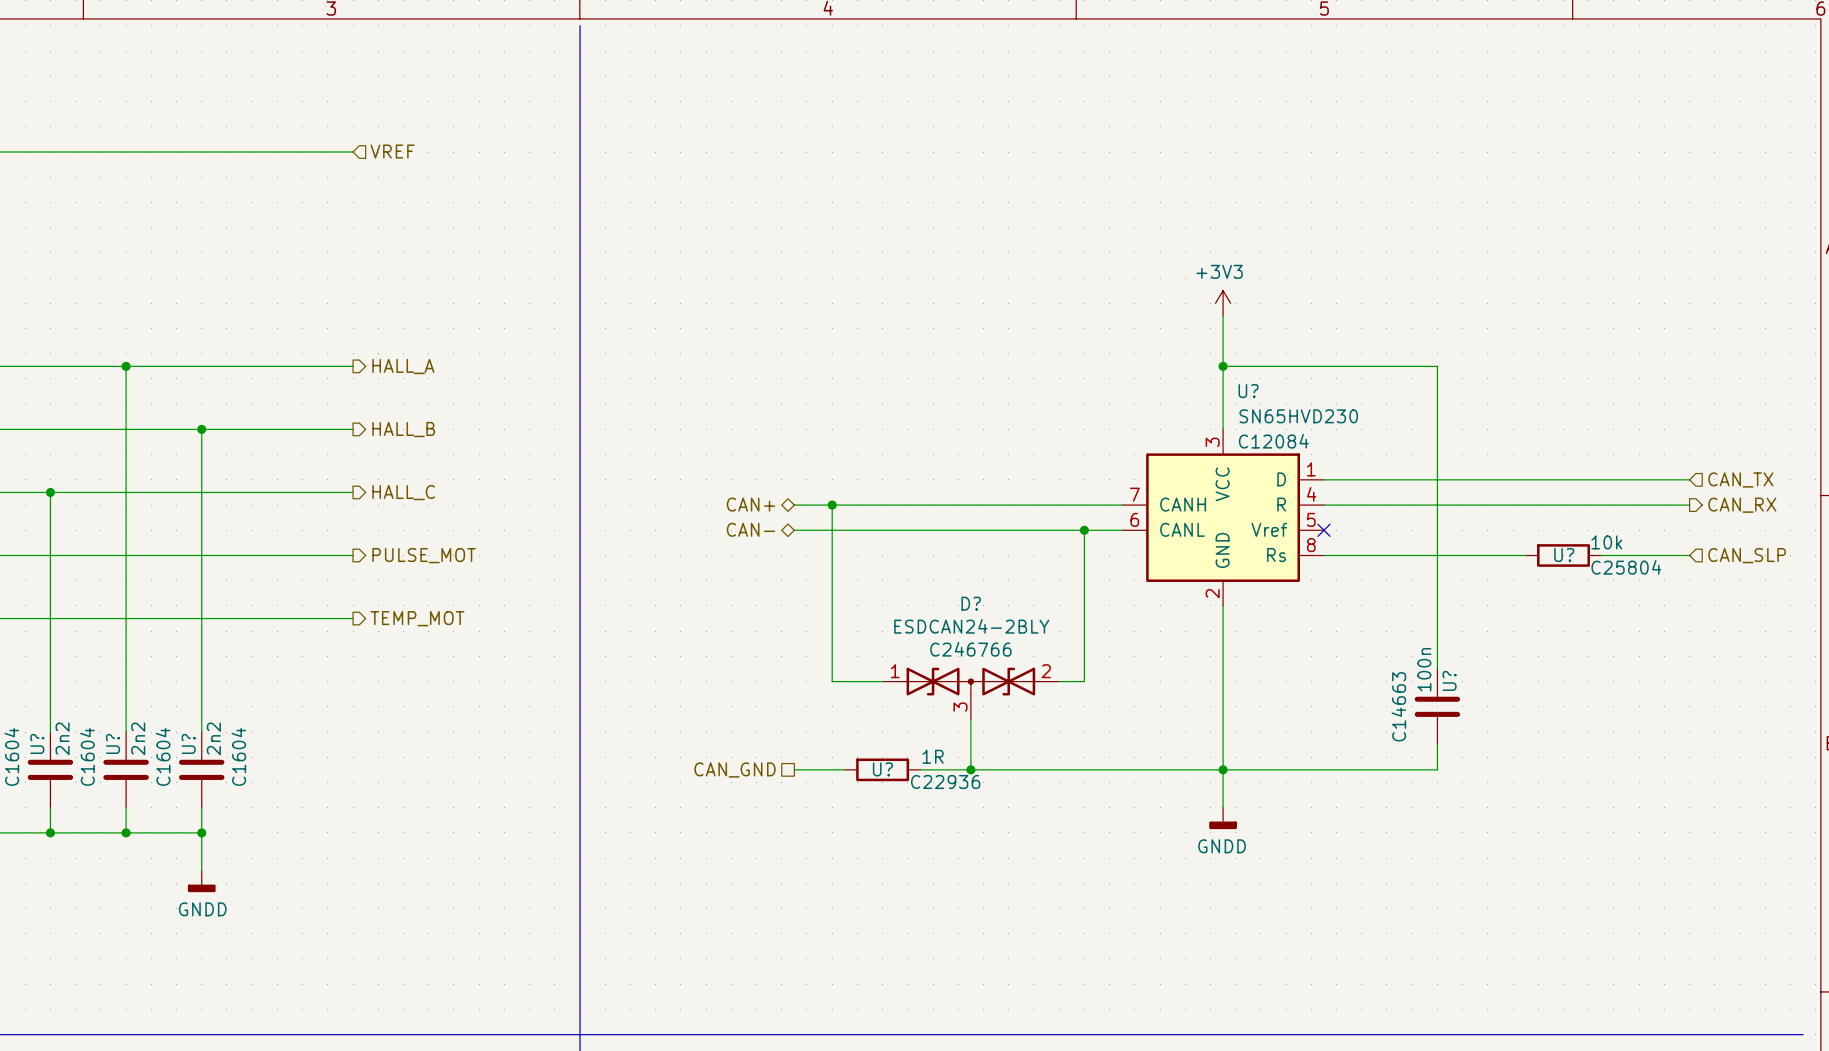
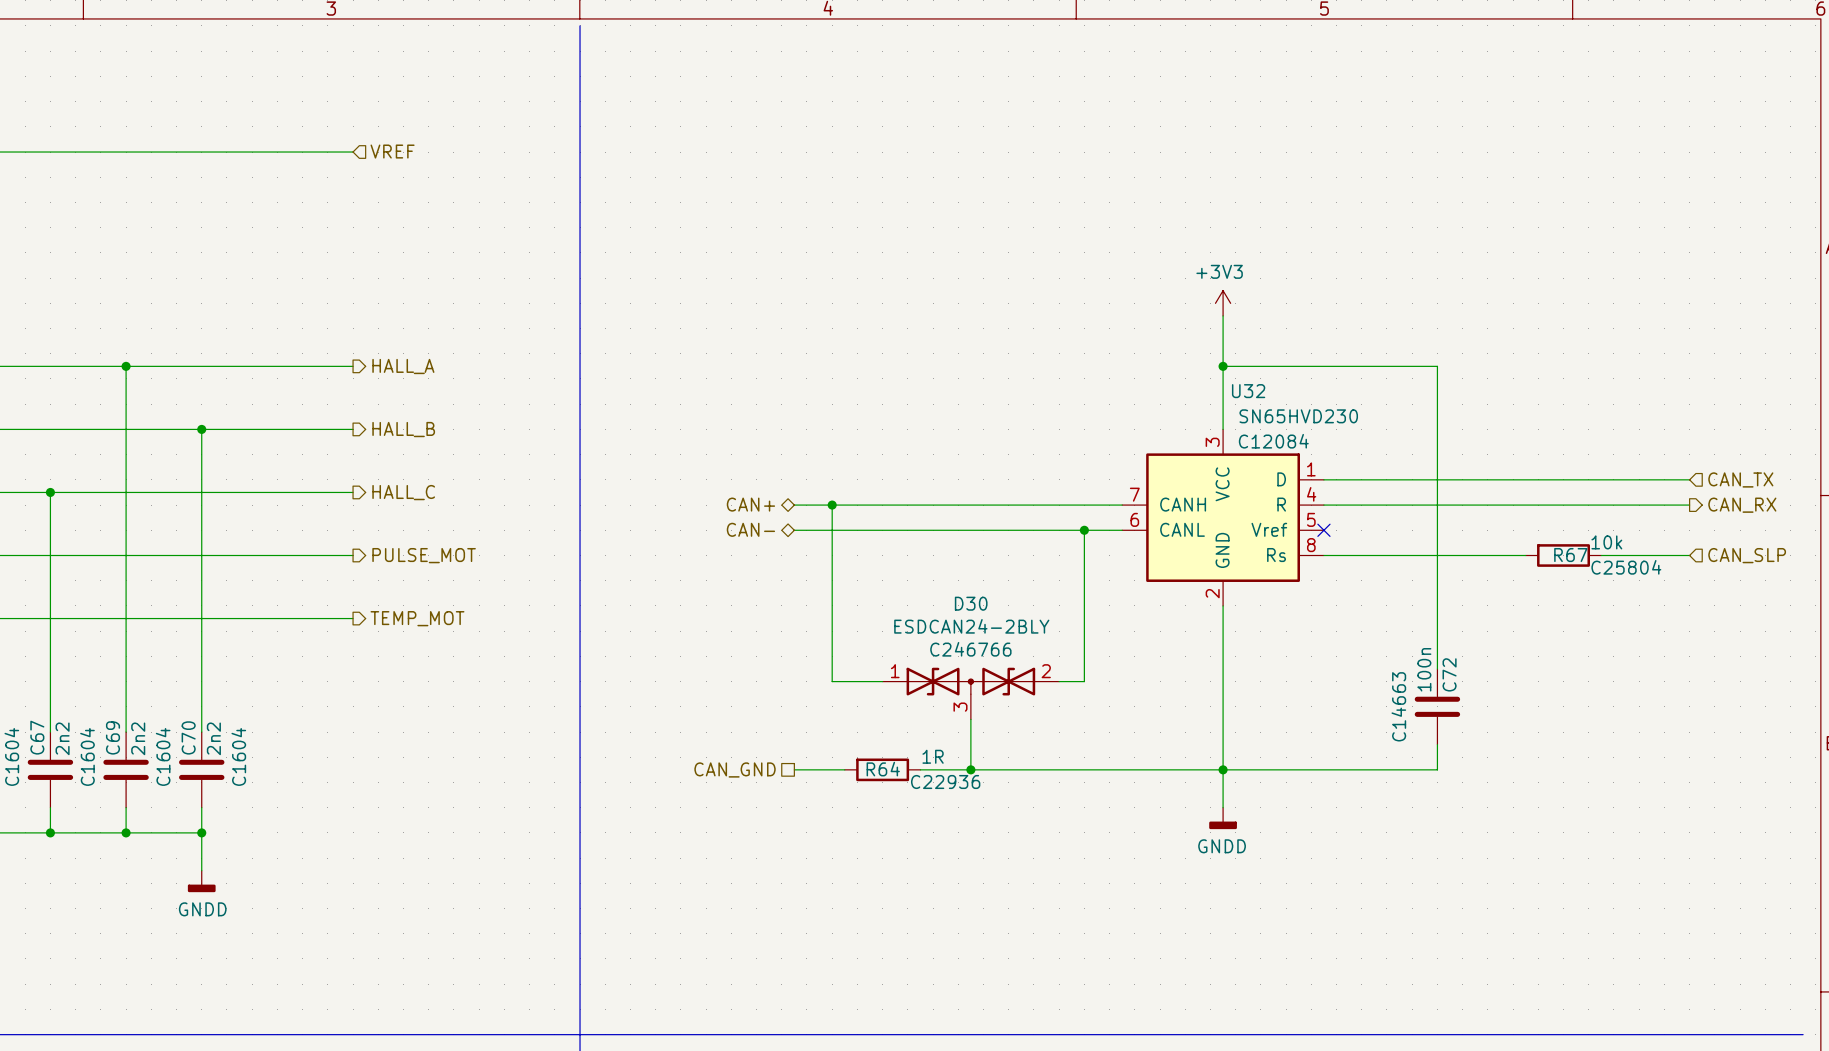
U? name: U? (1248, 391) -> U32 (1248, 391)
U? name: U? (1564, 555) -> R67 (1570, 555)
D? name: D? (971, 603) -> D30 (971, 603)
U? name: U? (1449, 680) -> C72 (1449, 674)
U? name: U? (37, 743) -> C67 (37, 737)
U? name: U? (113, 743) -> C69 (113, 737)
U? name: U? (188, 743) -> C70 (188, 737)
U? name: U? (882, 769) -> R64 (883, 769)

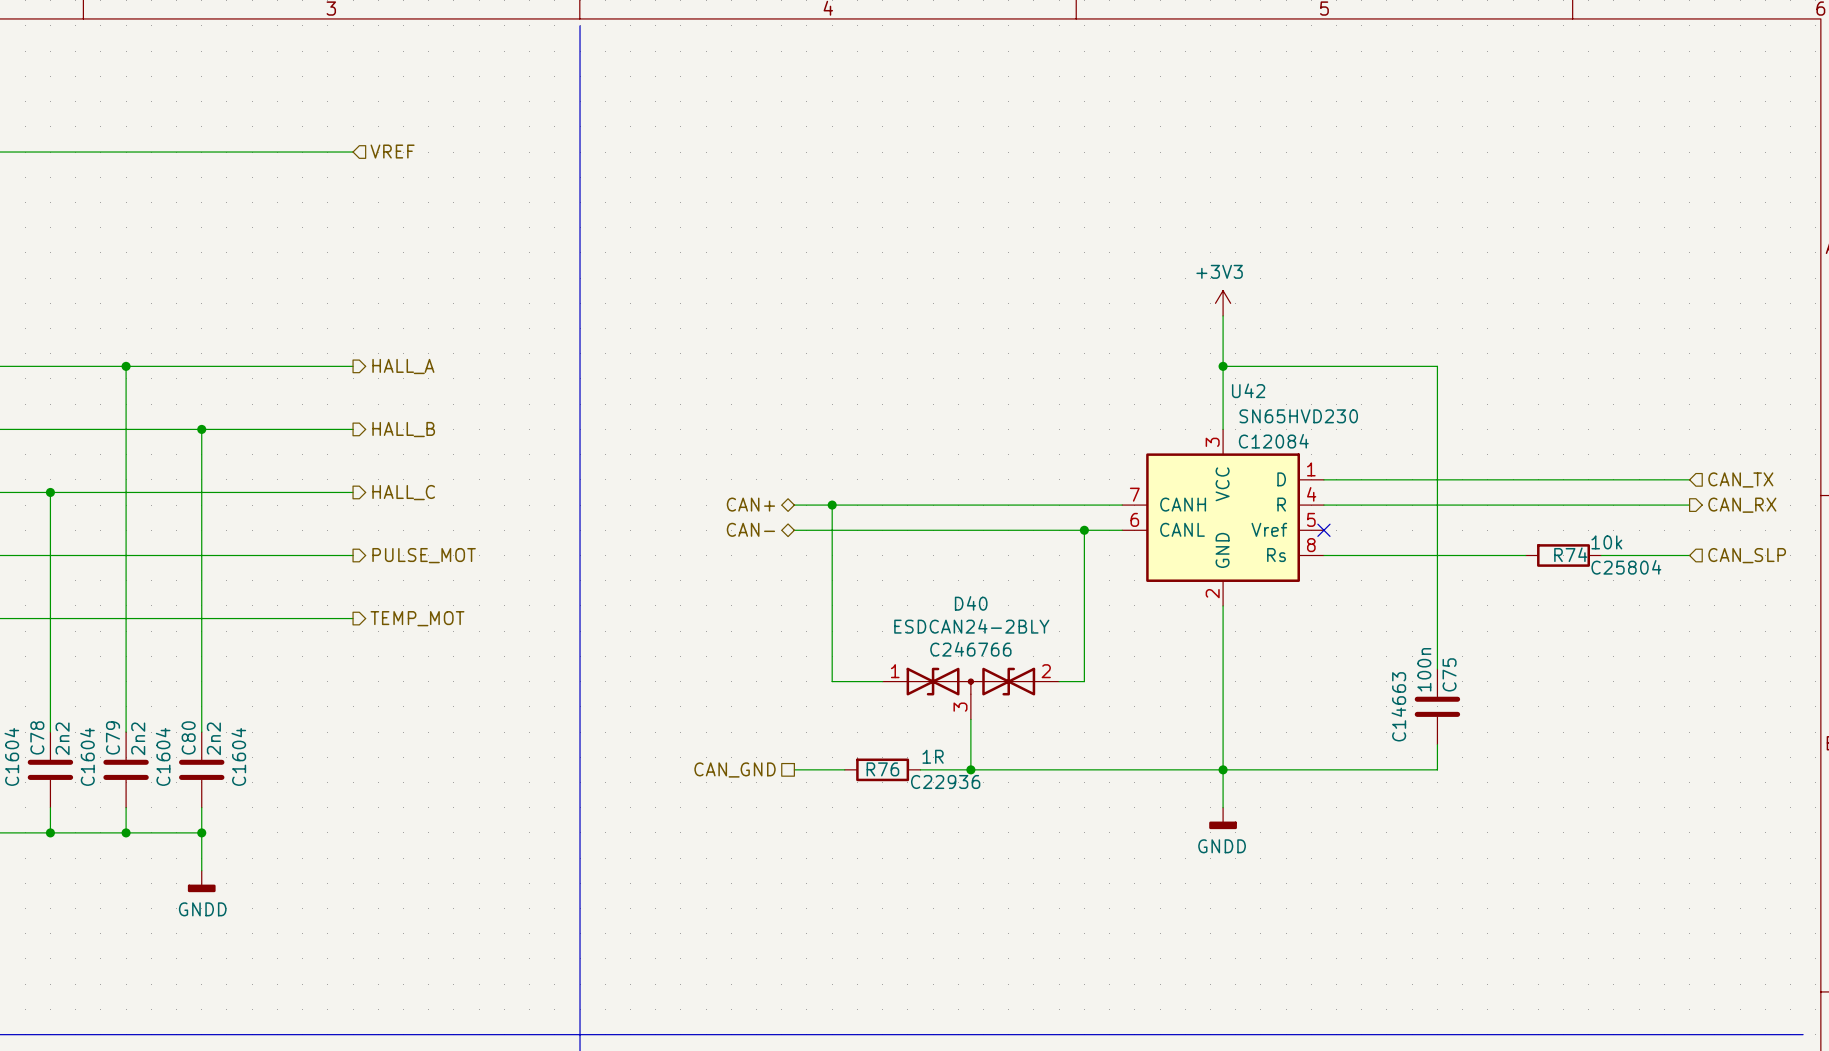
U32 name: U32 (1248, 391) -> U42 (1248, 390)
R67 name: R67 (1570, 555) -> R74 (1570, 554)
D30 name: D30 (971, 603) -> D40 (971, 603)
C72 name: C72 (1449, 674) -> C75 (1449, 674)
C67 name: C67 (37, 737) -> C78 (37, 737)
C69 name: C69 (113, 737) -> C79 (113, 737)
C70 name: C70 (188, 737) -> C80 (188, 737)
R64 name: R64 (883, 769) -> R76 (882, 769)

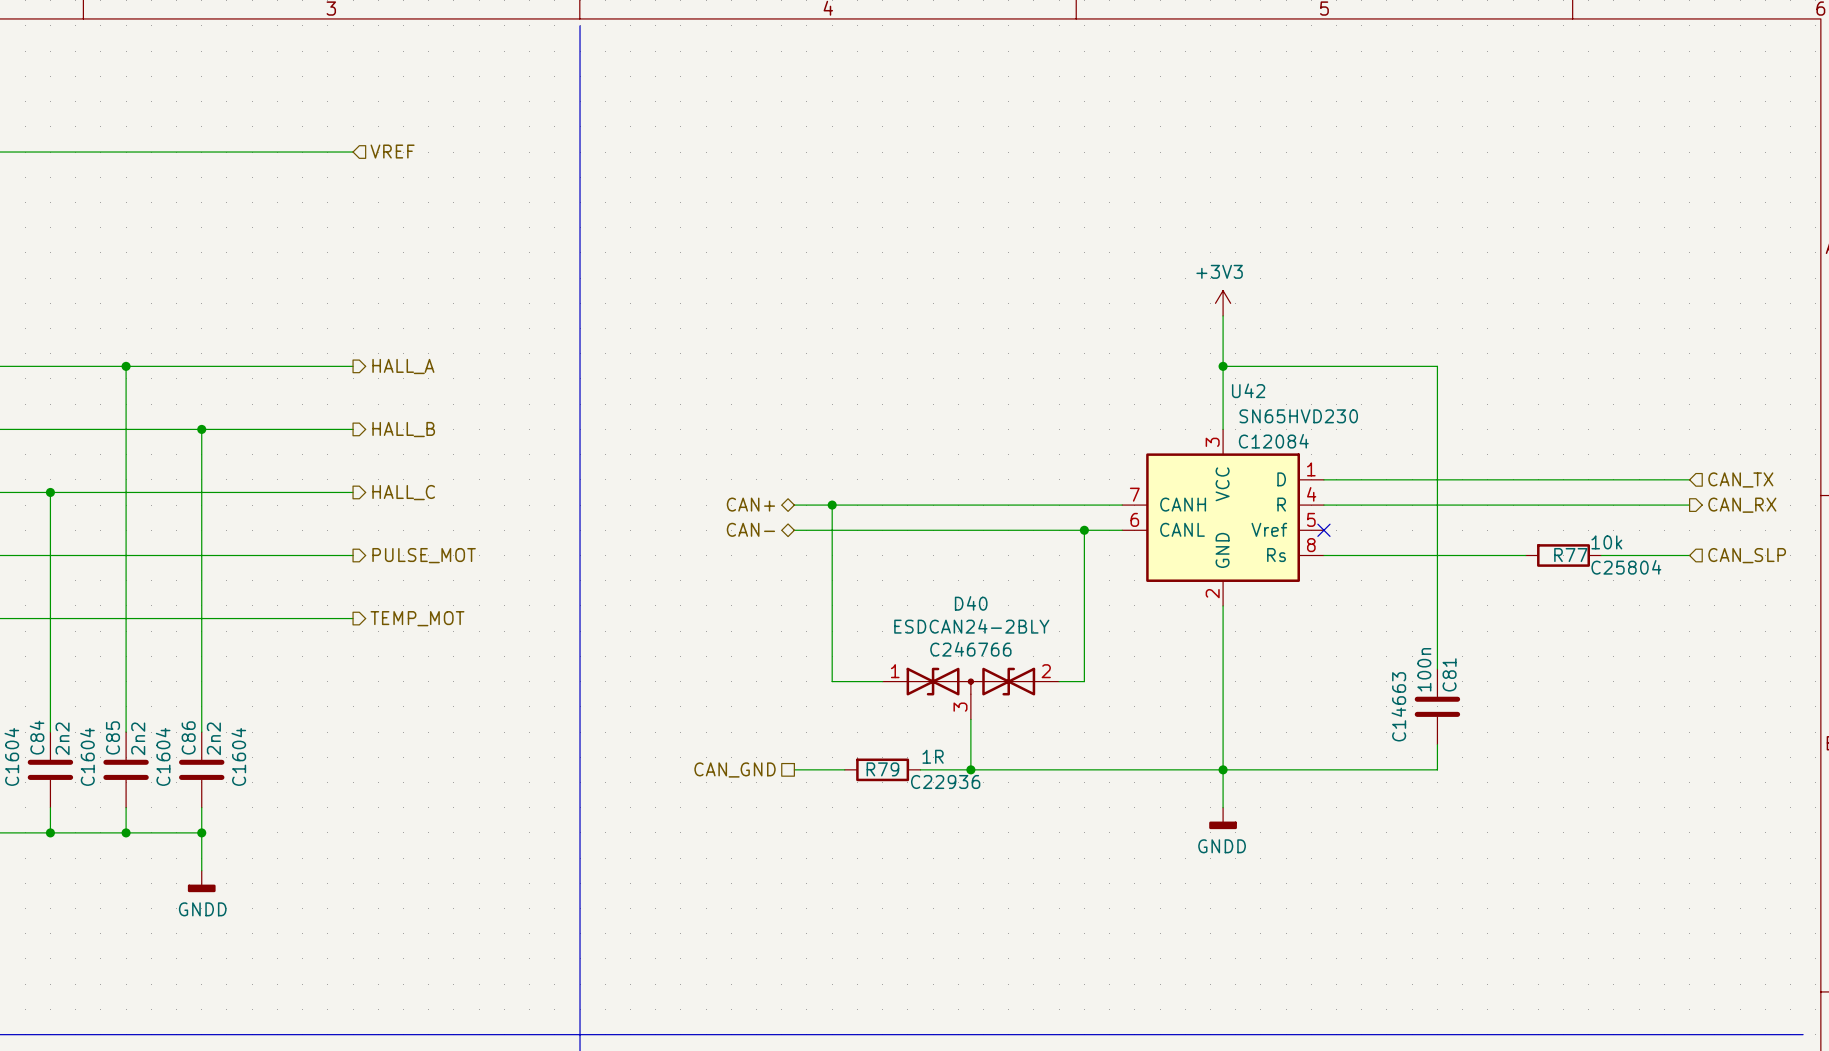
R74 name: R74 (1570, 554) -> R77 (1570, 555)
C75 name: C75 (1449, 674) -> C81 (1449, 674)
C78 name: C78 (37, 737) -> C84 (37, 737)
C79 name: C79 (113, 737) -> C85 (113, 737)
C80 name: C80 (188, 737) -> C86 (188, 737)
R76 name: R76 (882, 769) -> R79 (882, 769)

